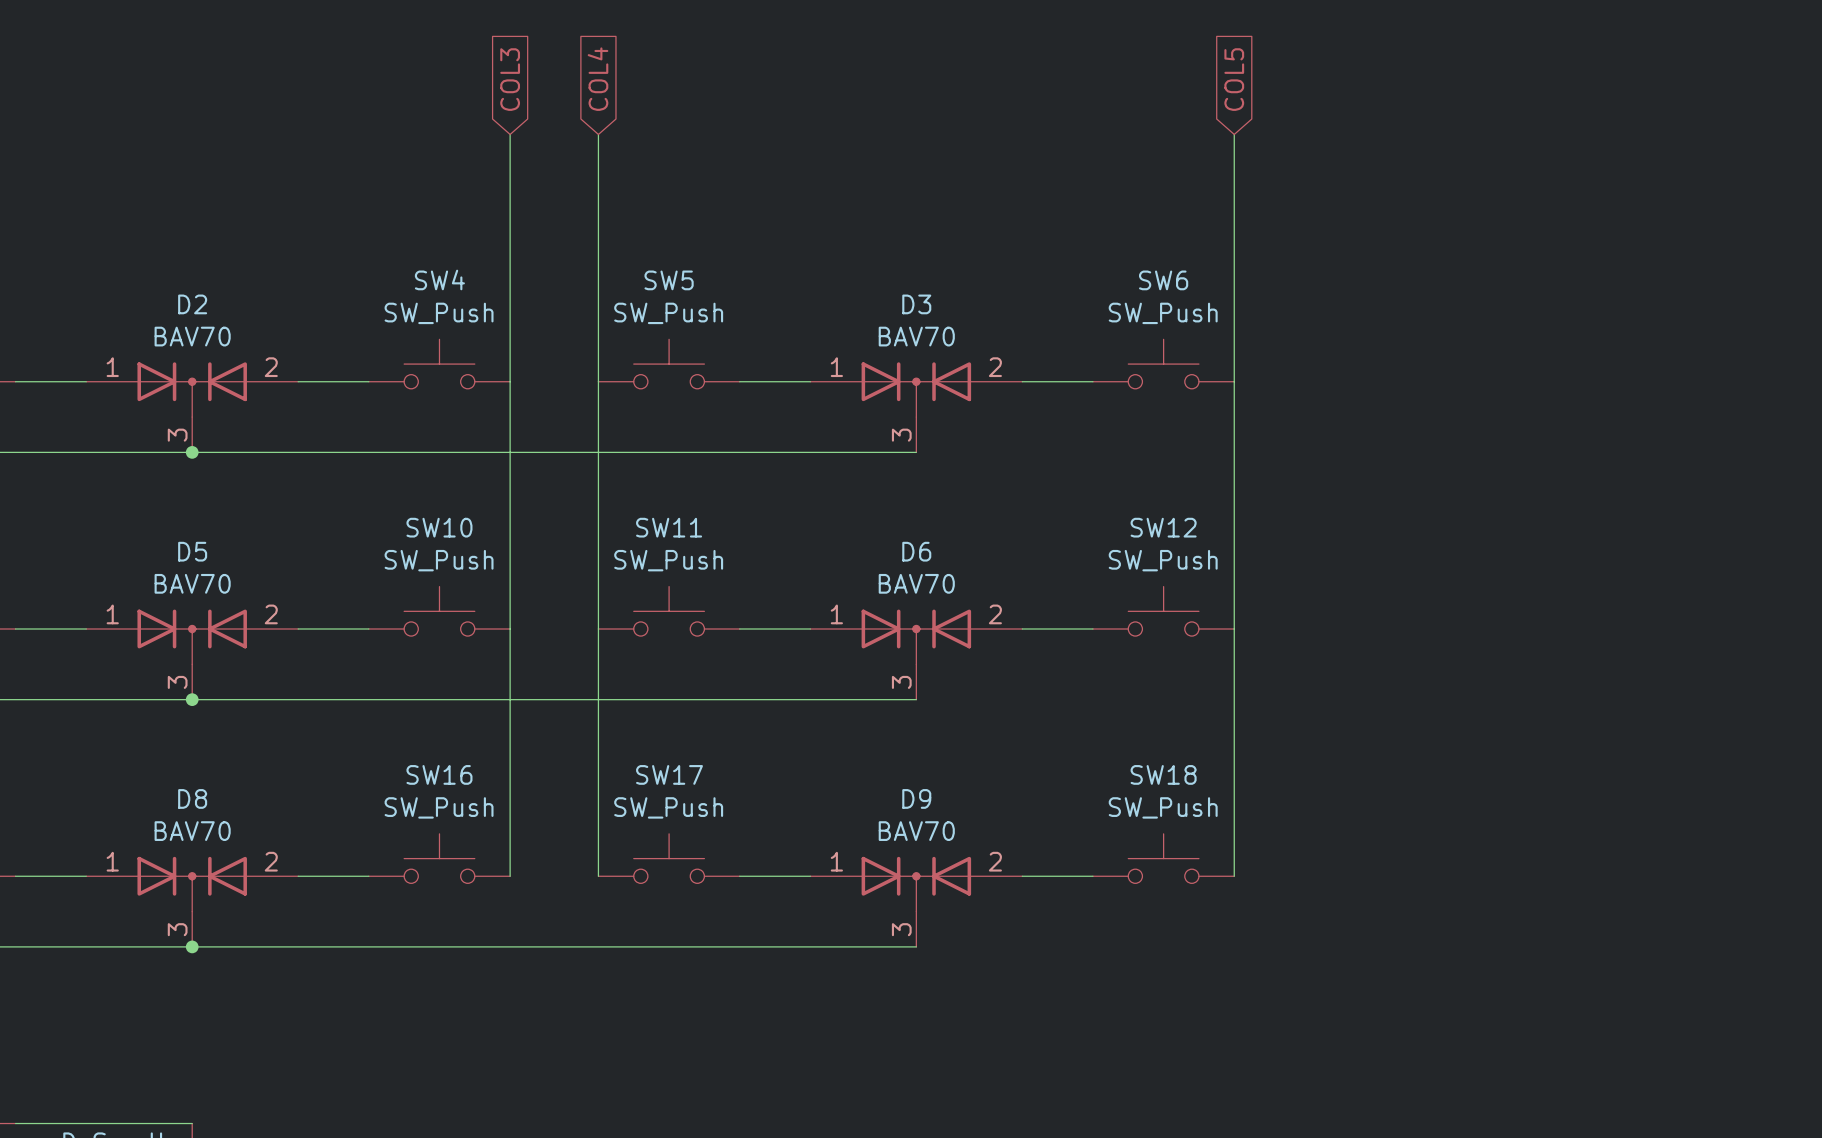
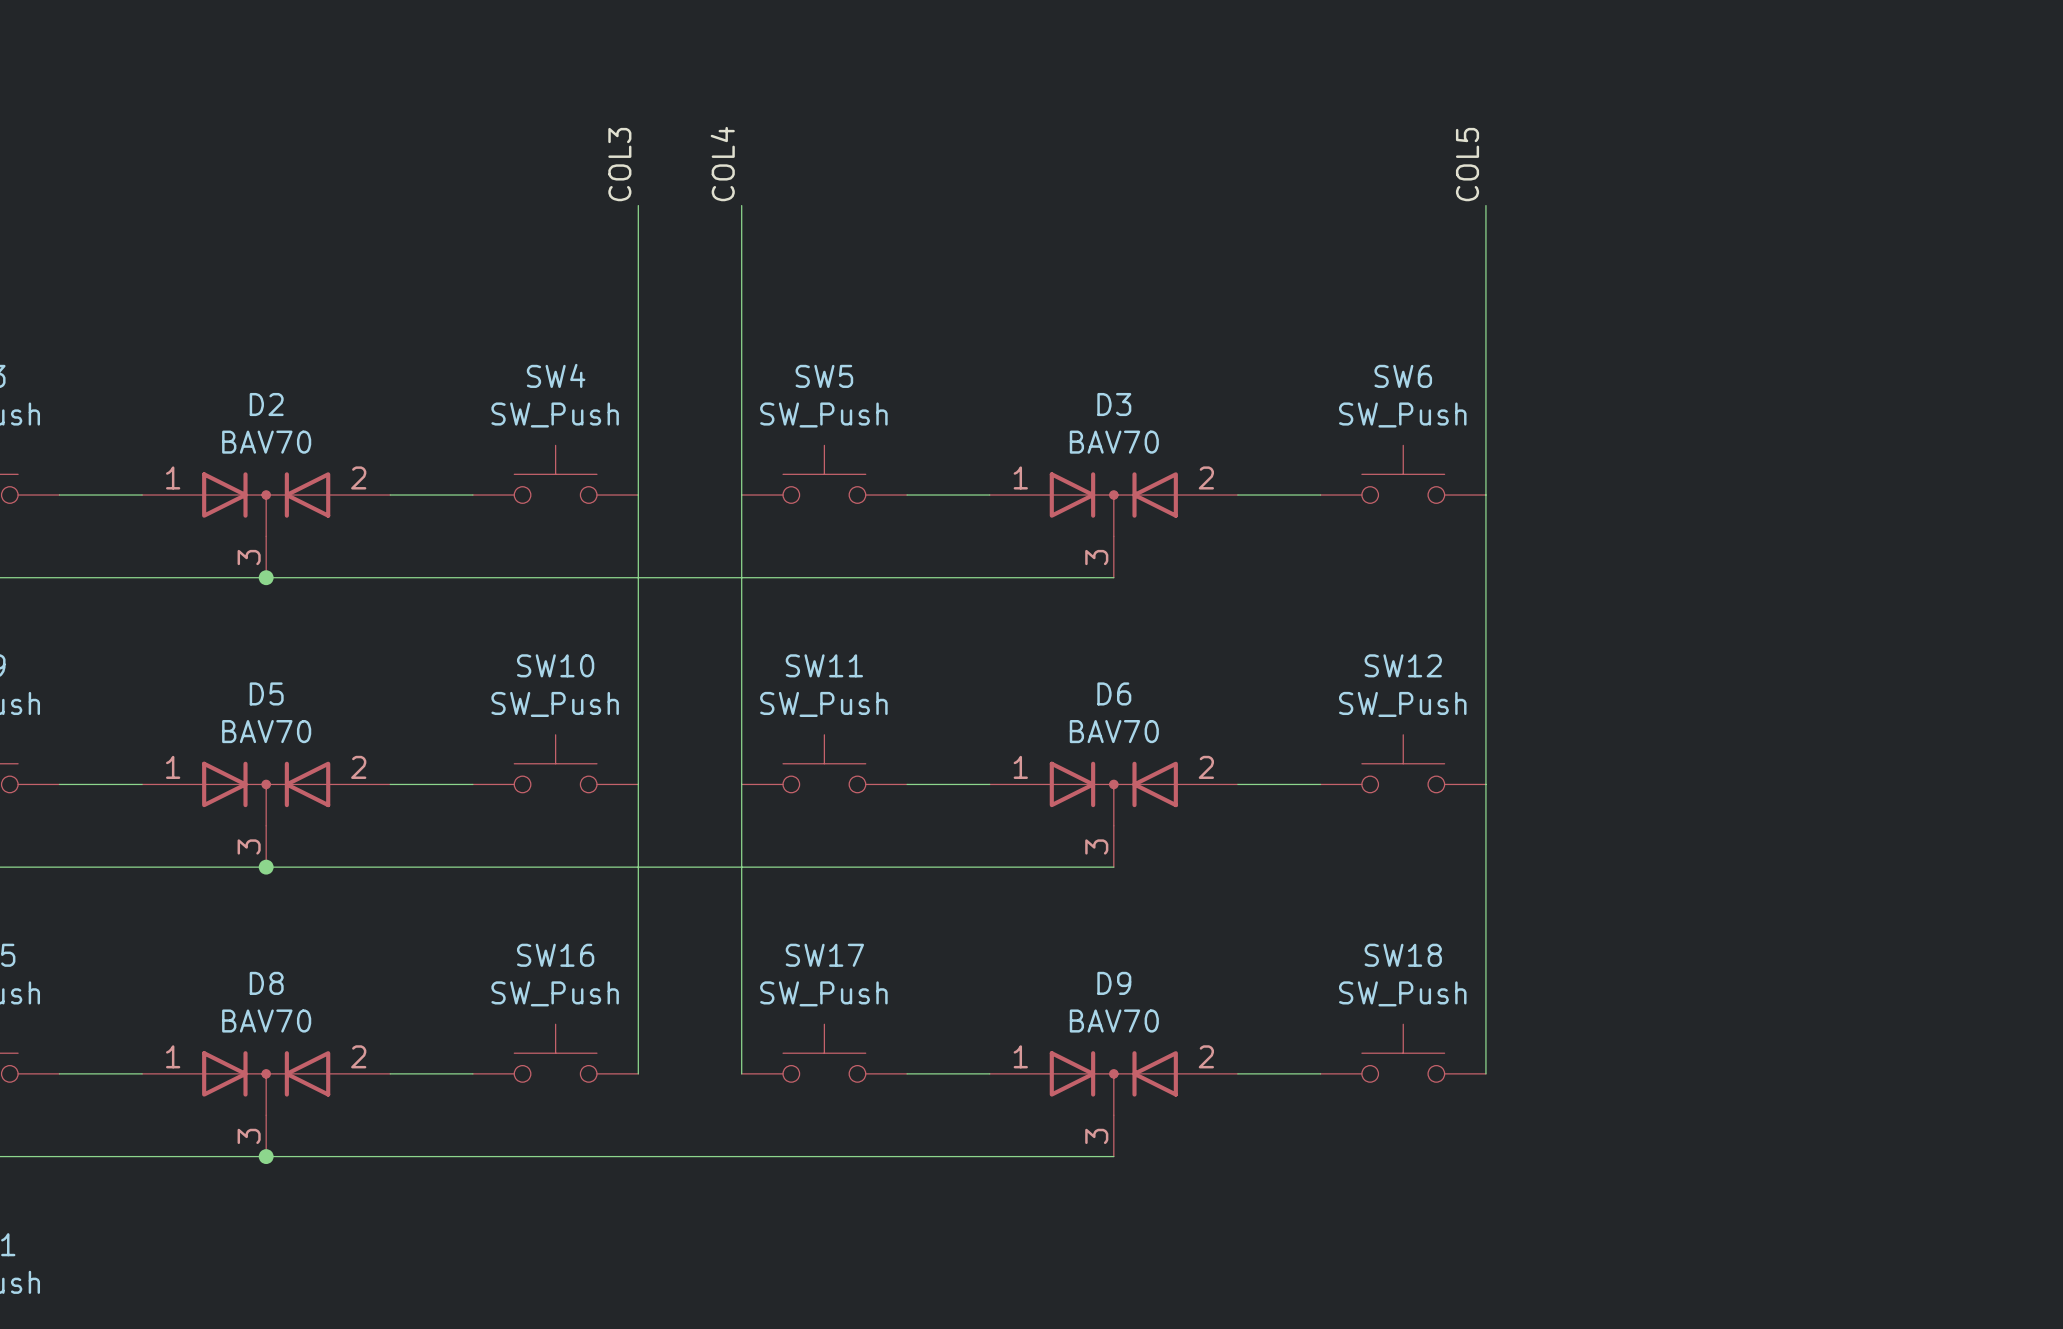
global label: COL3 (510, 79) -> none
global label: COL4 (598, 79) -> none
global label: COL5 (1234, 79) -> none
label: none -> COL3 (619, 164)
label: none -> COL4 (722, 164)
label: none -> COL5 (1467, 164)

